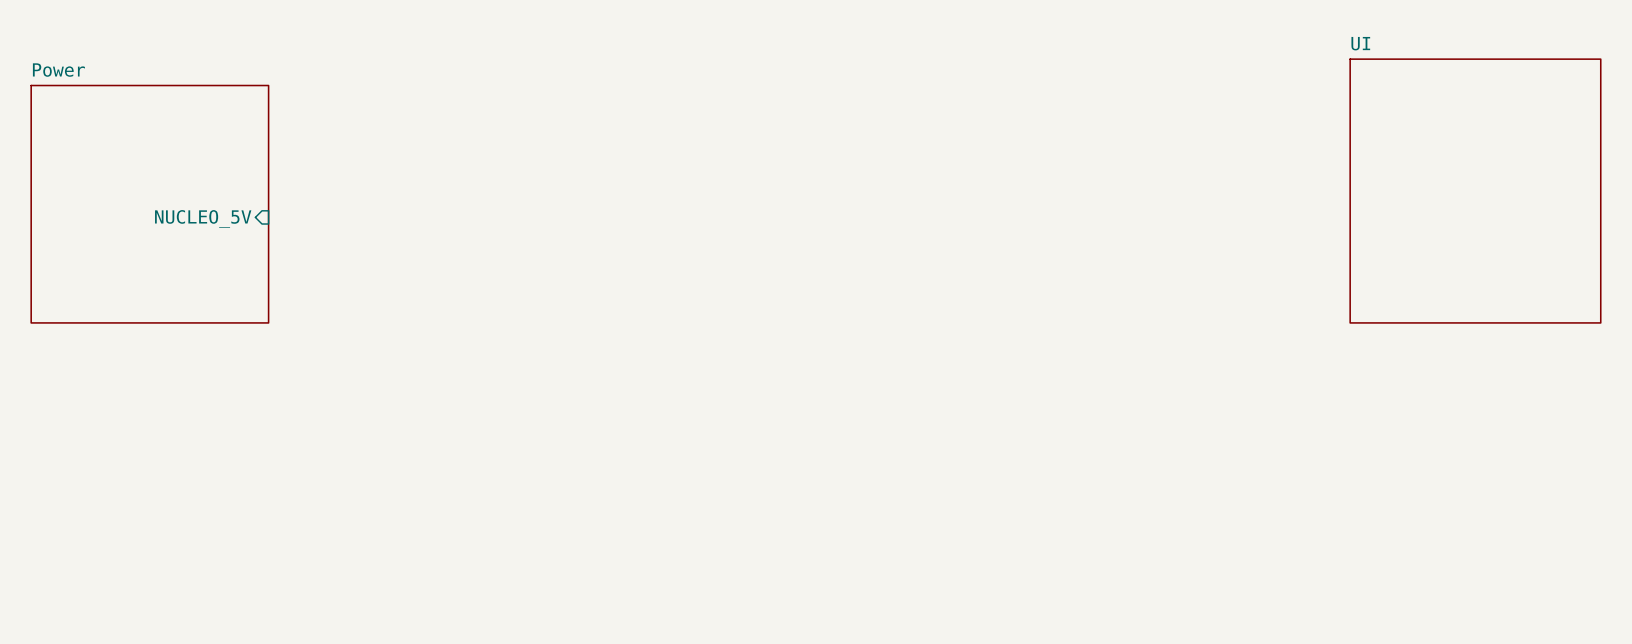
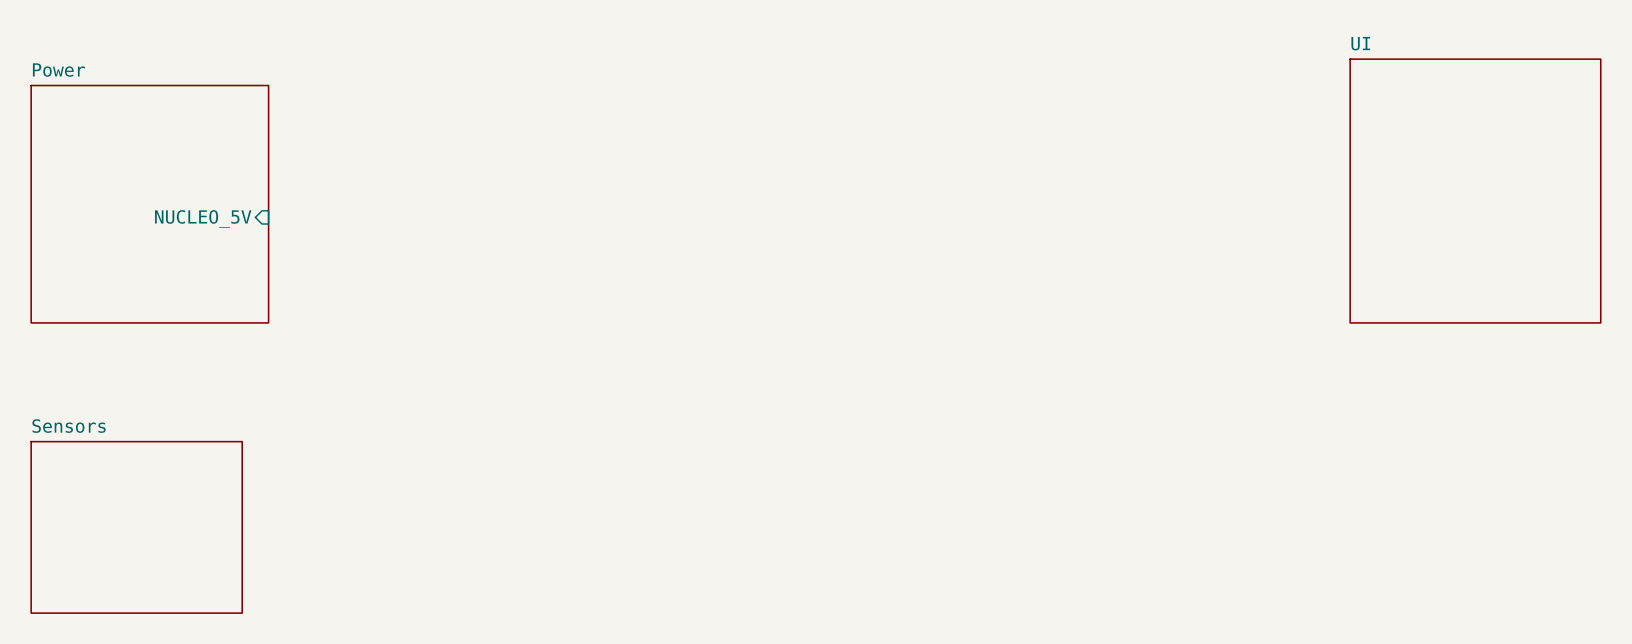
sheet Sensors: none -> (136, 527)

